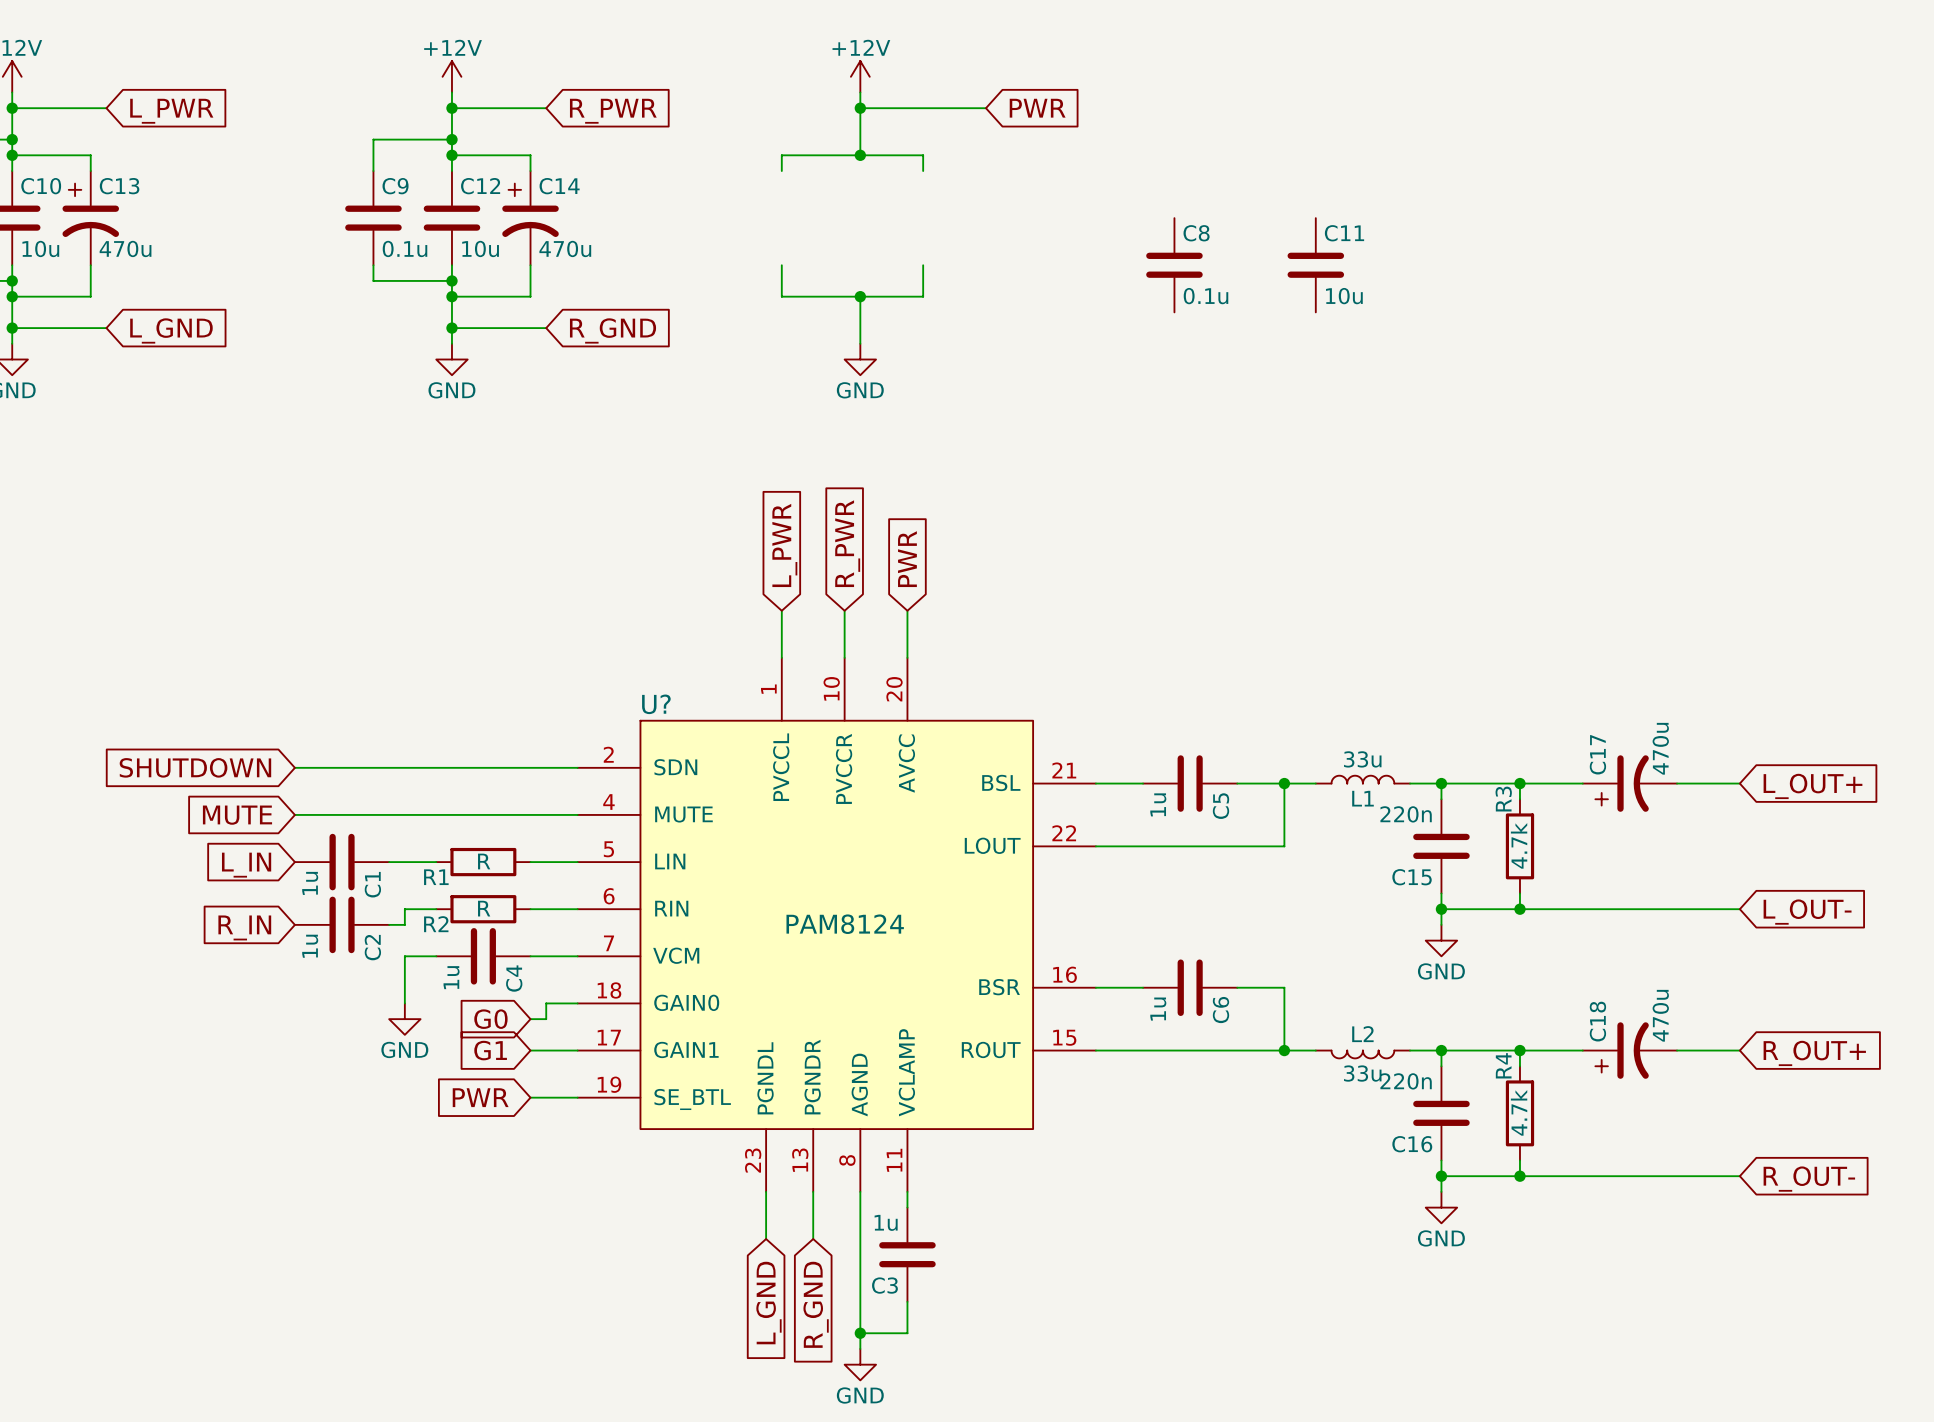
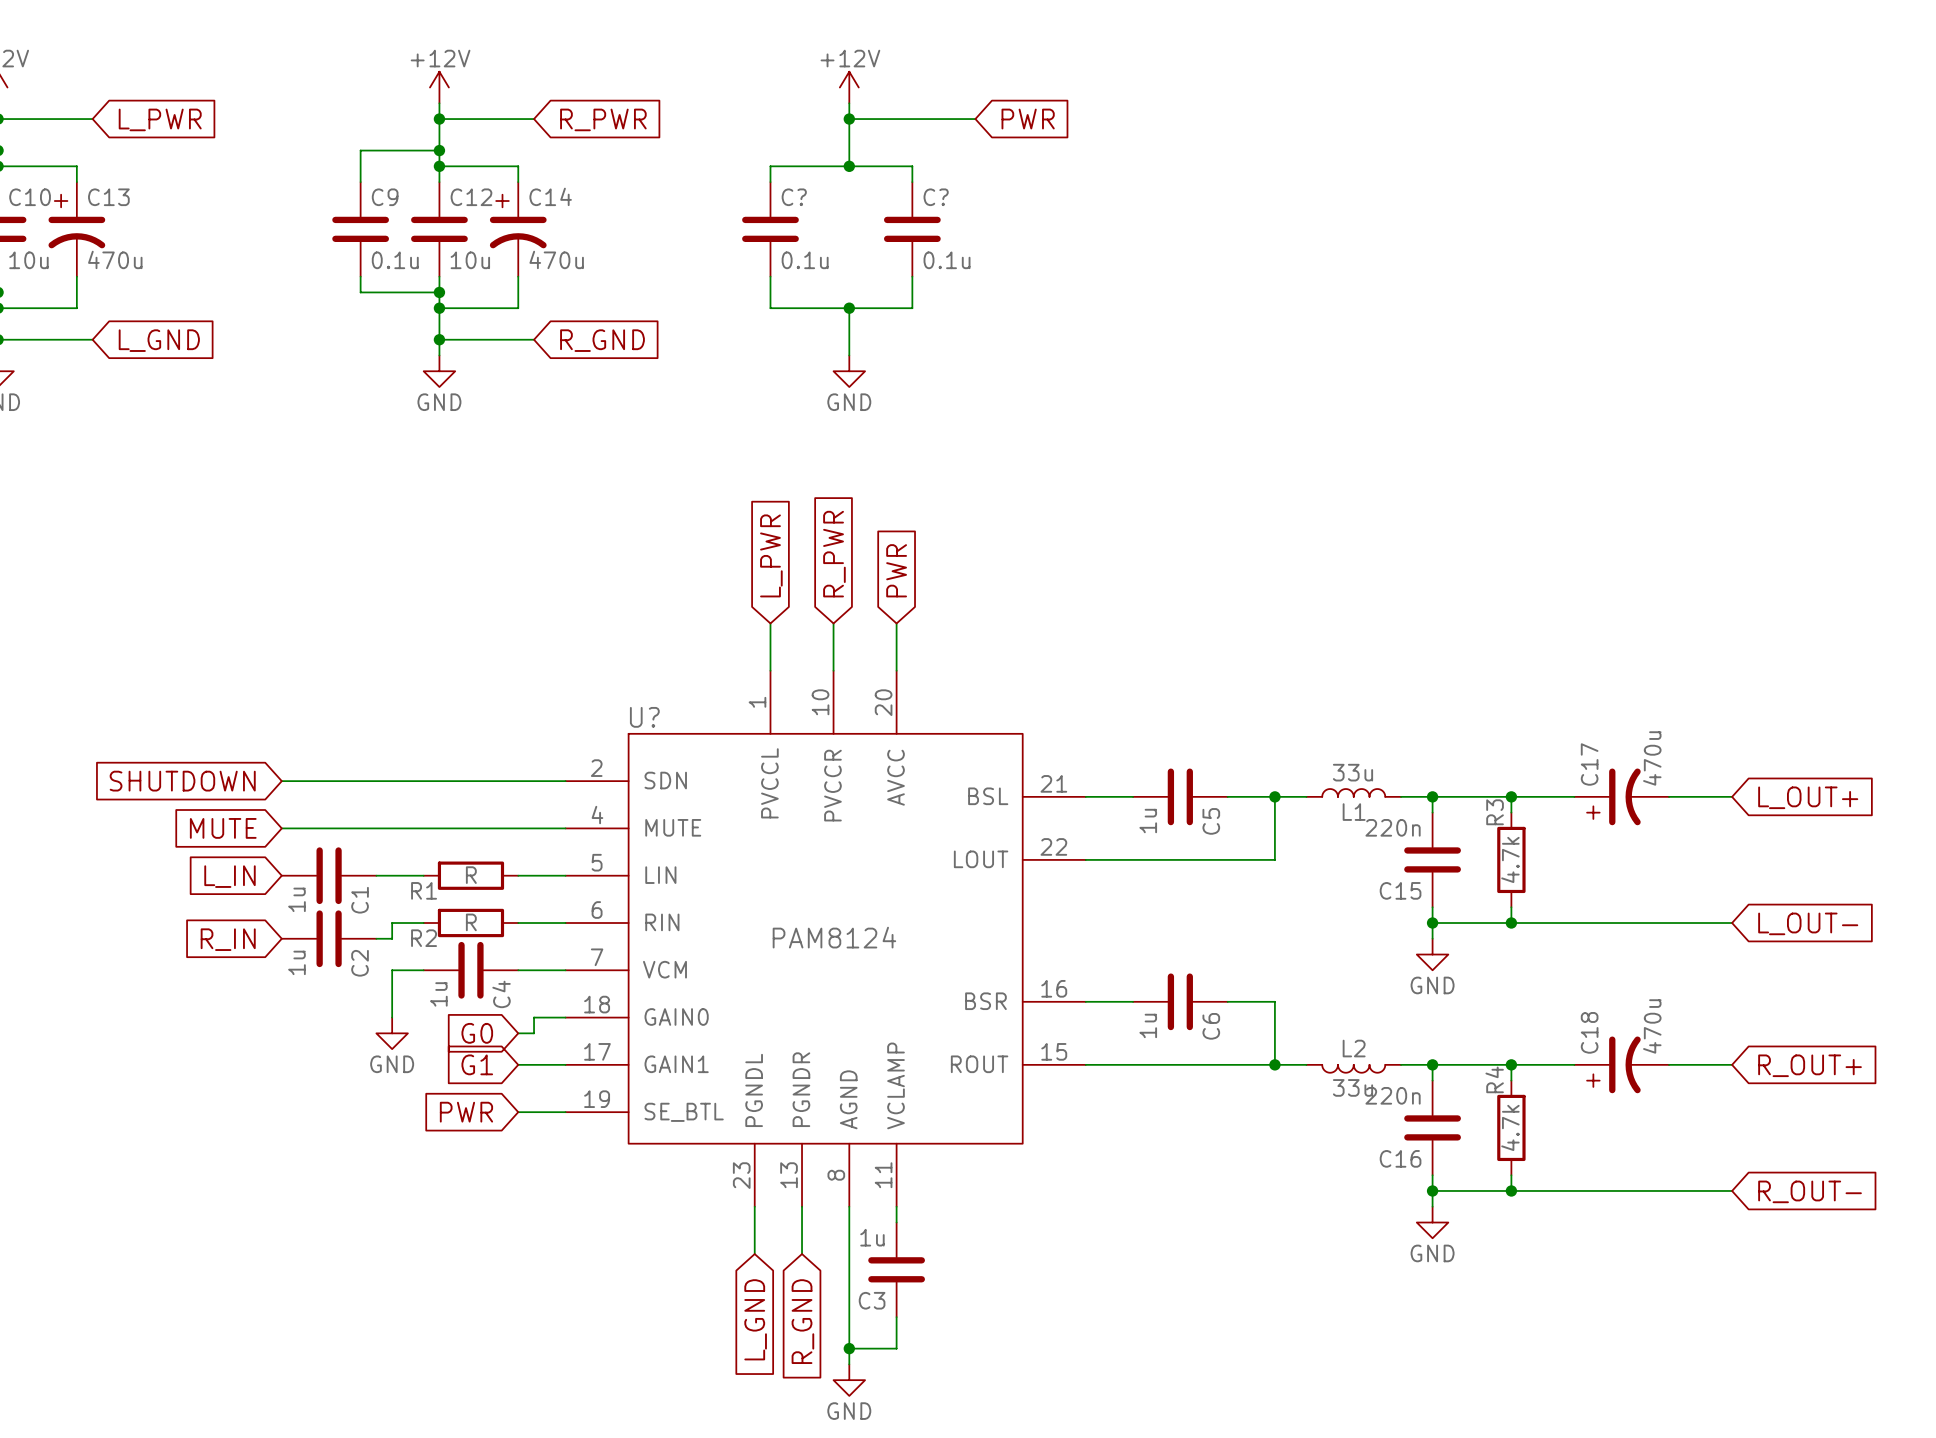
C?: none -> 0.1u (770, 229)
C?: none -> 0.1u (912, 229)
C8: 0.1u (1174, 265) -> none
C11: 10u (1315, 265) -> none

